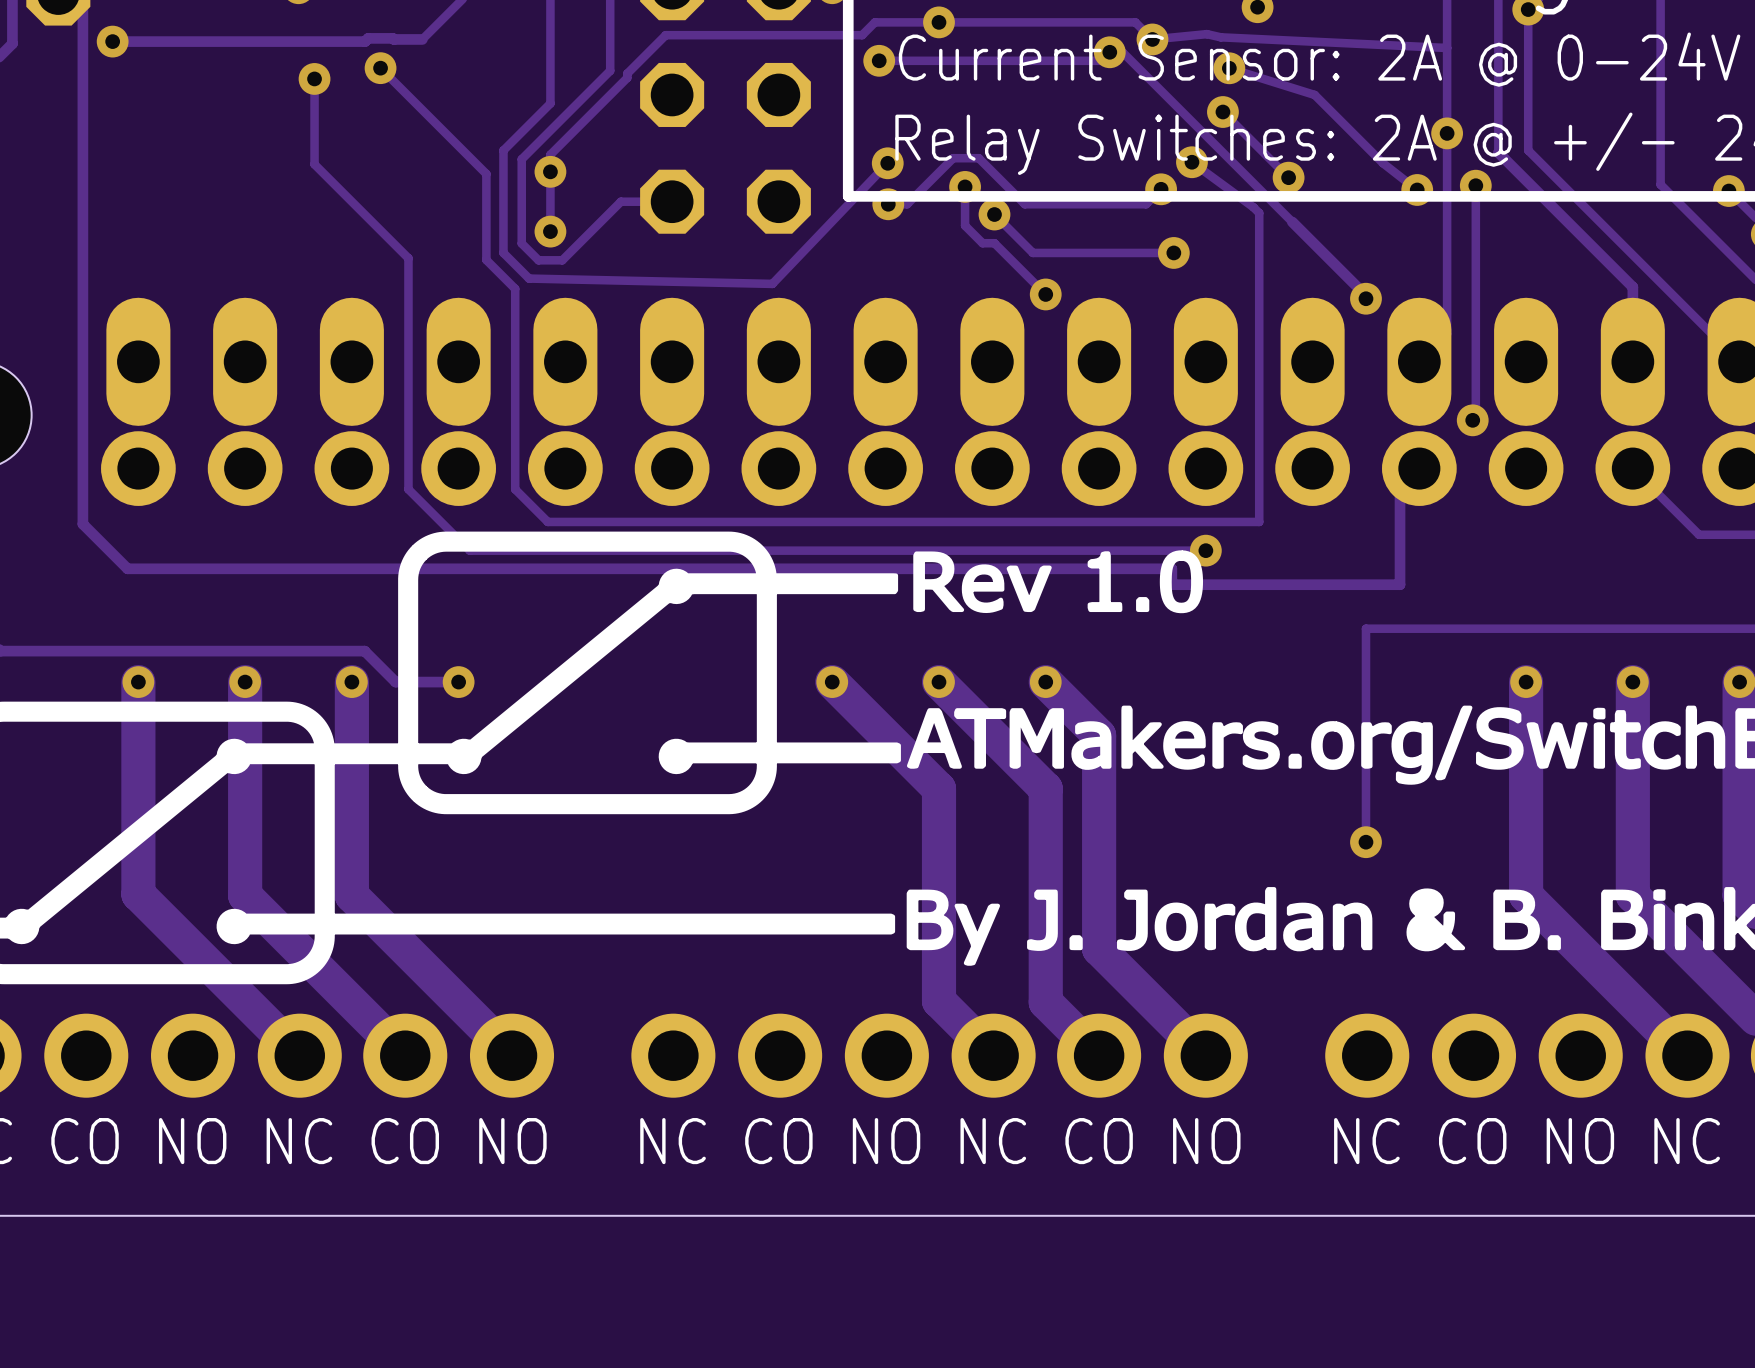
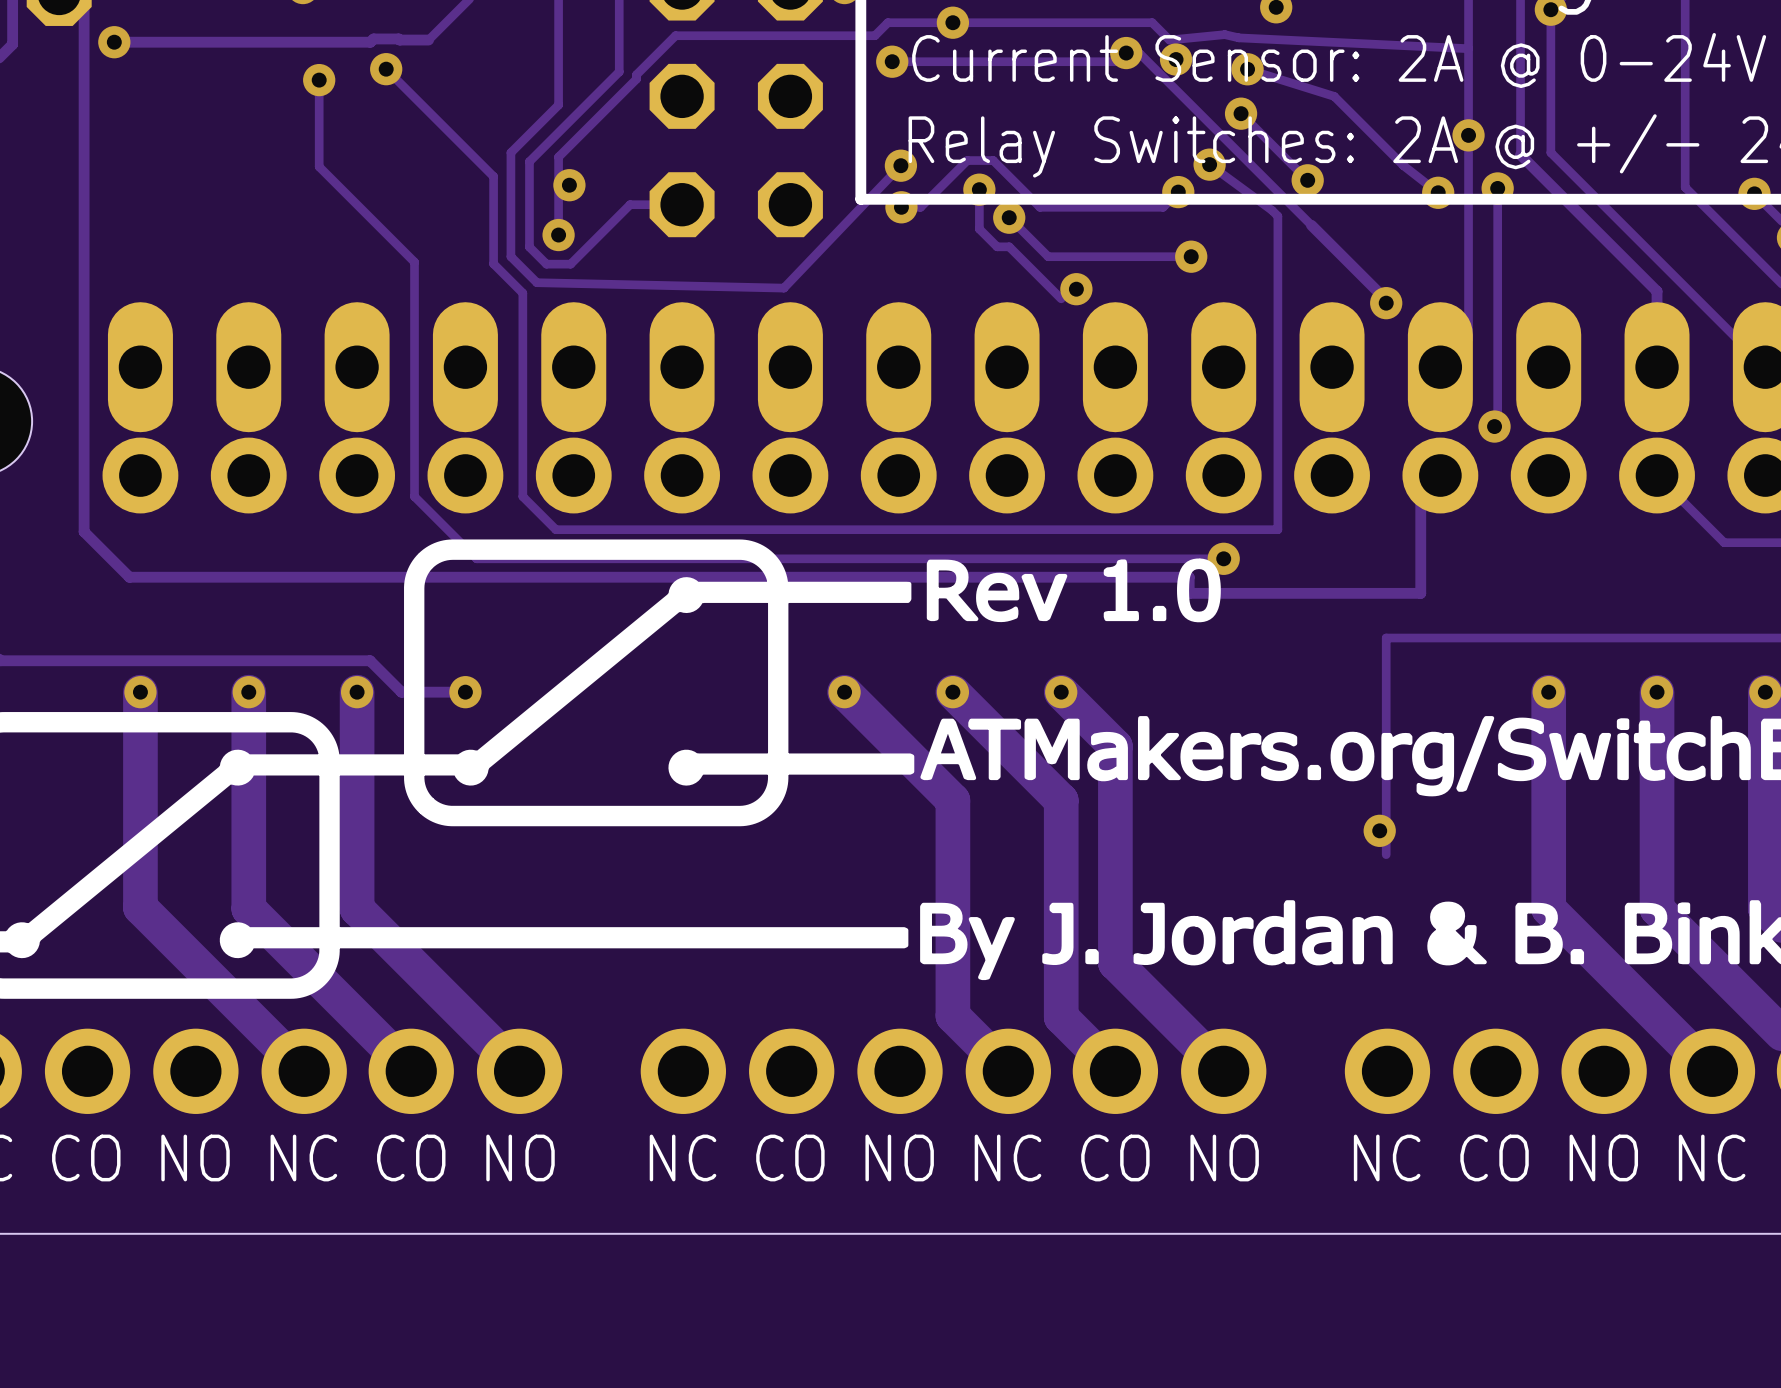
via position: (1152, 39) -> (1176, 59)
via position: (550, 171) -> (569, 185)
via position: (1045, 294) -> (1076, 289)
via position: (1365, 842) -> (1379, 830)

